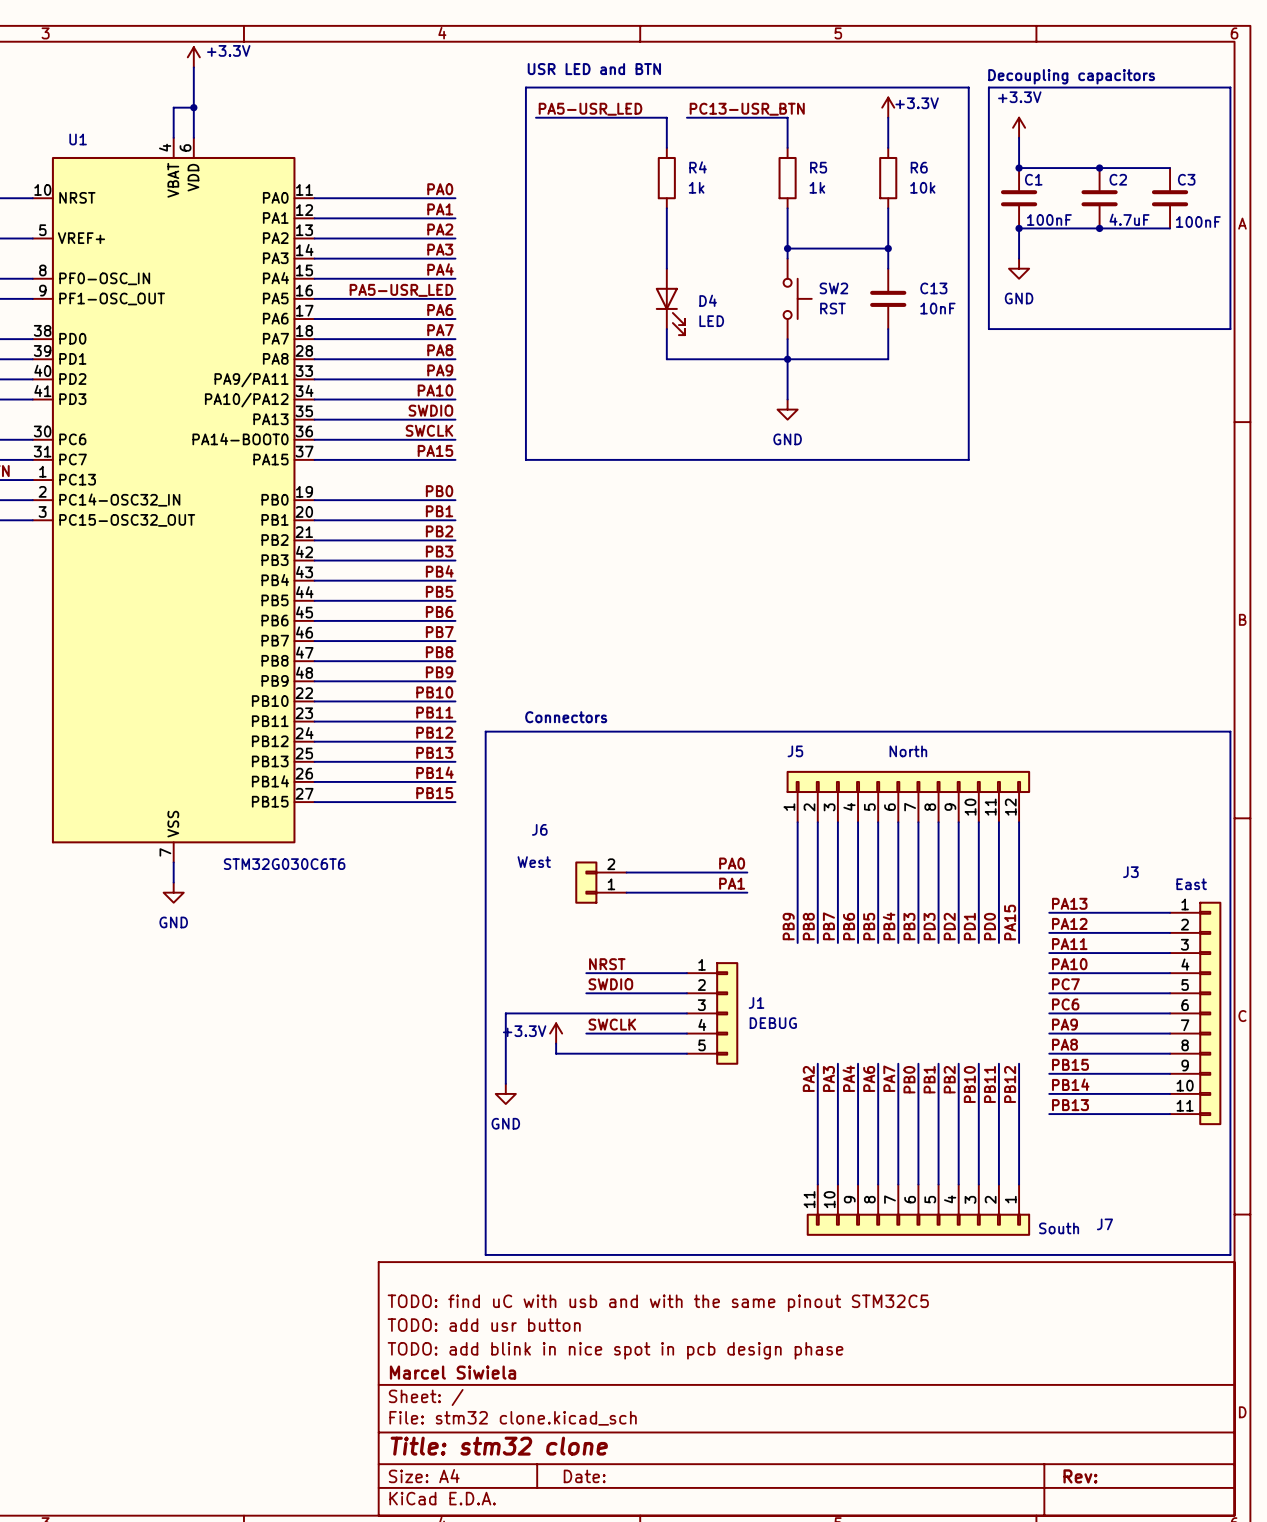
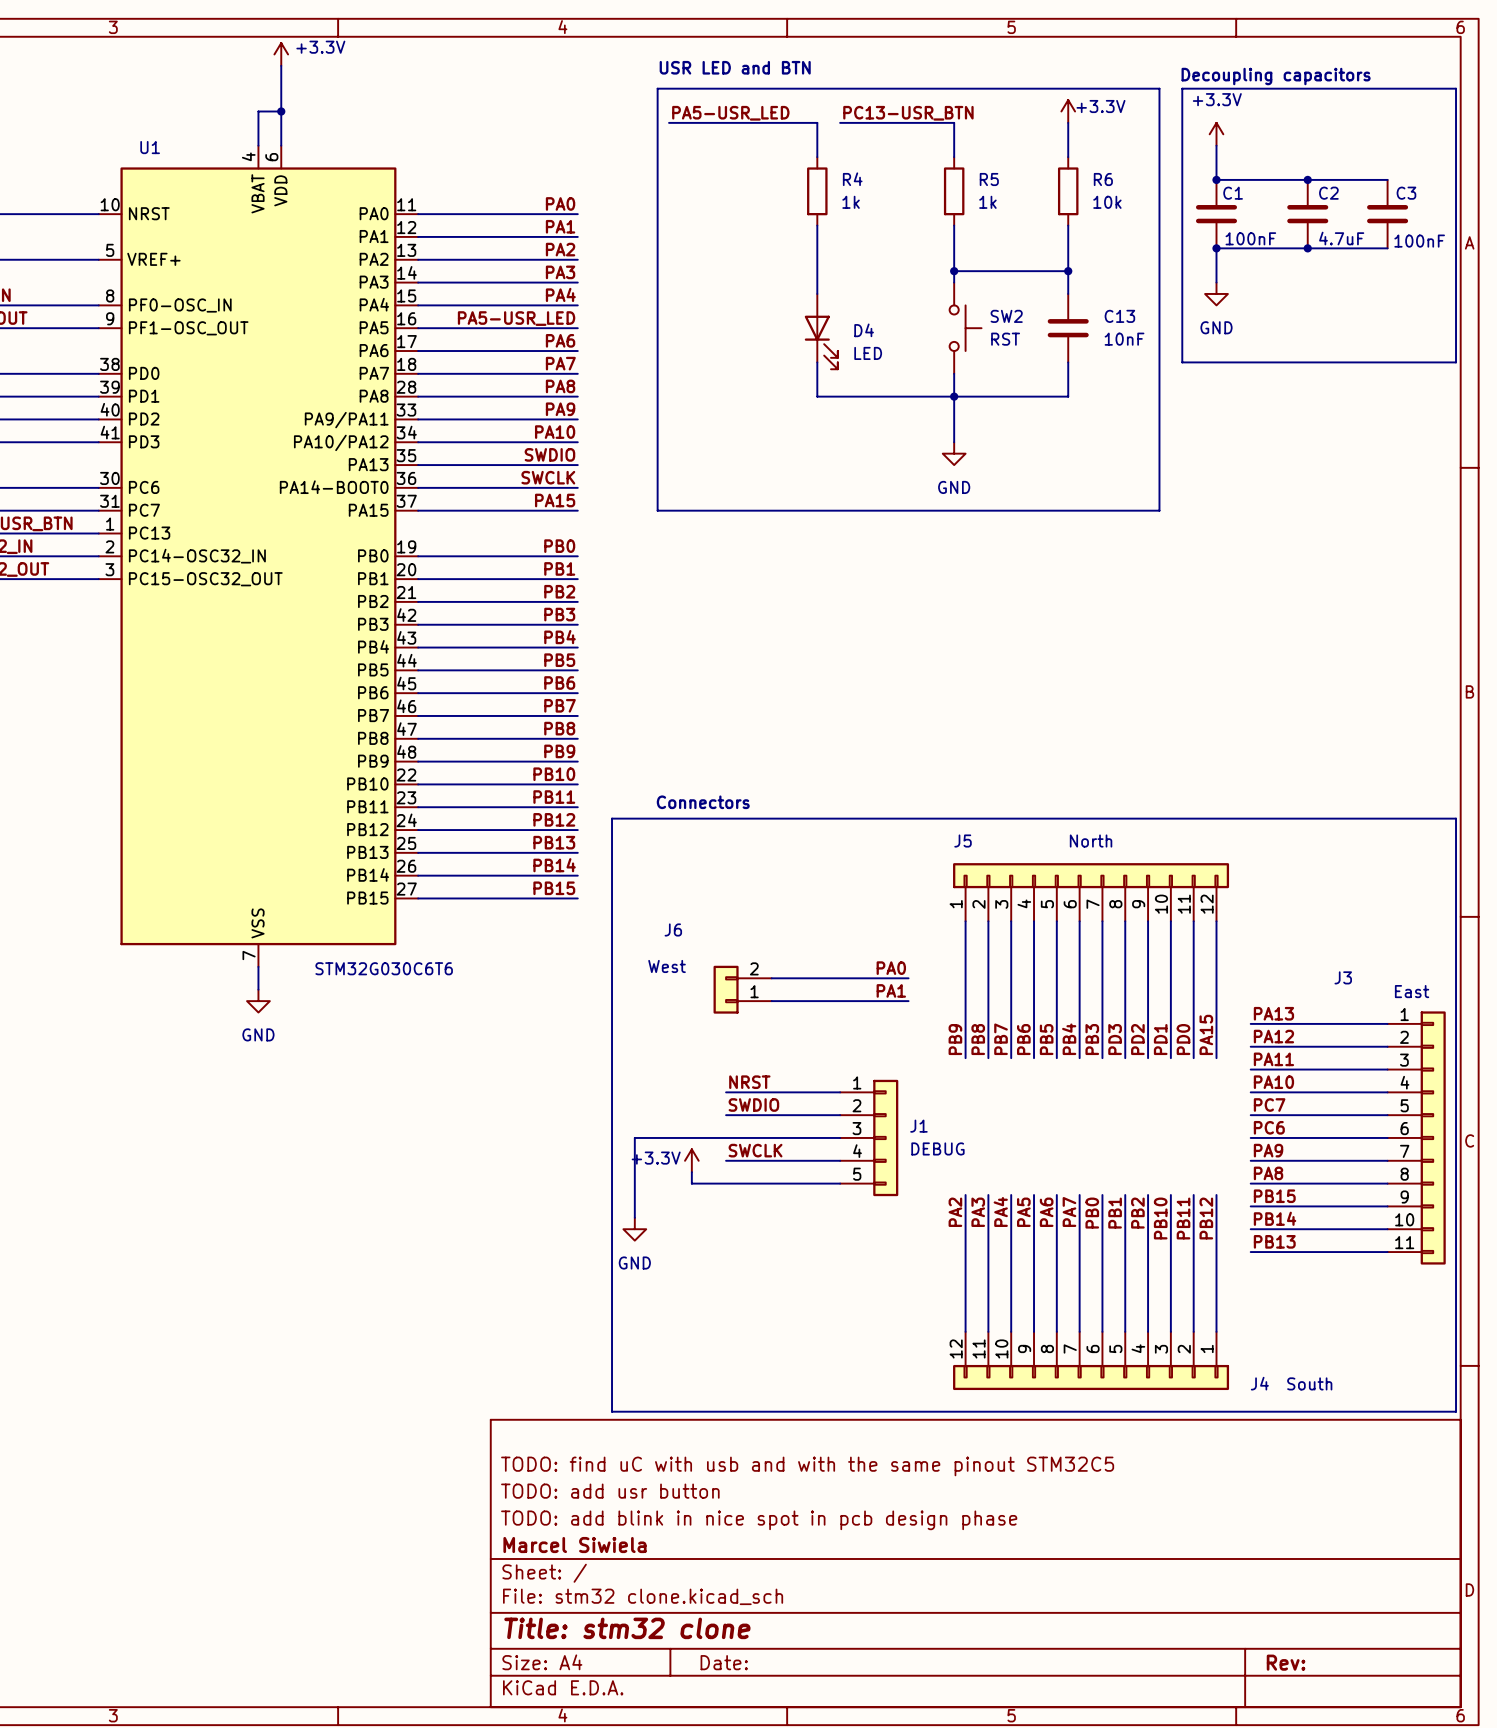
wire: none -> (965, 1195) (965, 1331)
label: none -> PA2 (955, 1212)
label: PA2 (808, 1078) -> PA3 (978, 1212)
label: PA3 (828, 1078) -> PA4 (1000, 1211)
label: PA4 (848, 1078) -> PA5 (1023, 1212)
J4: none -> South (1091, 1360)
J7: South (918, 1210) -> none

